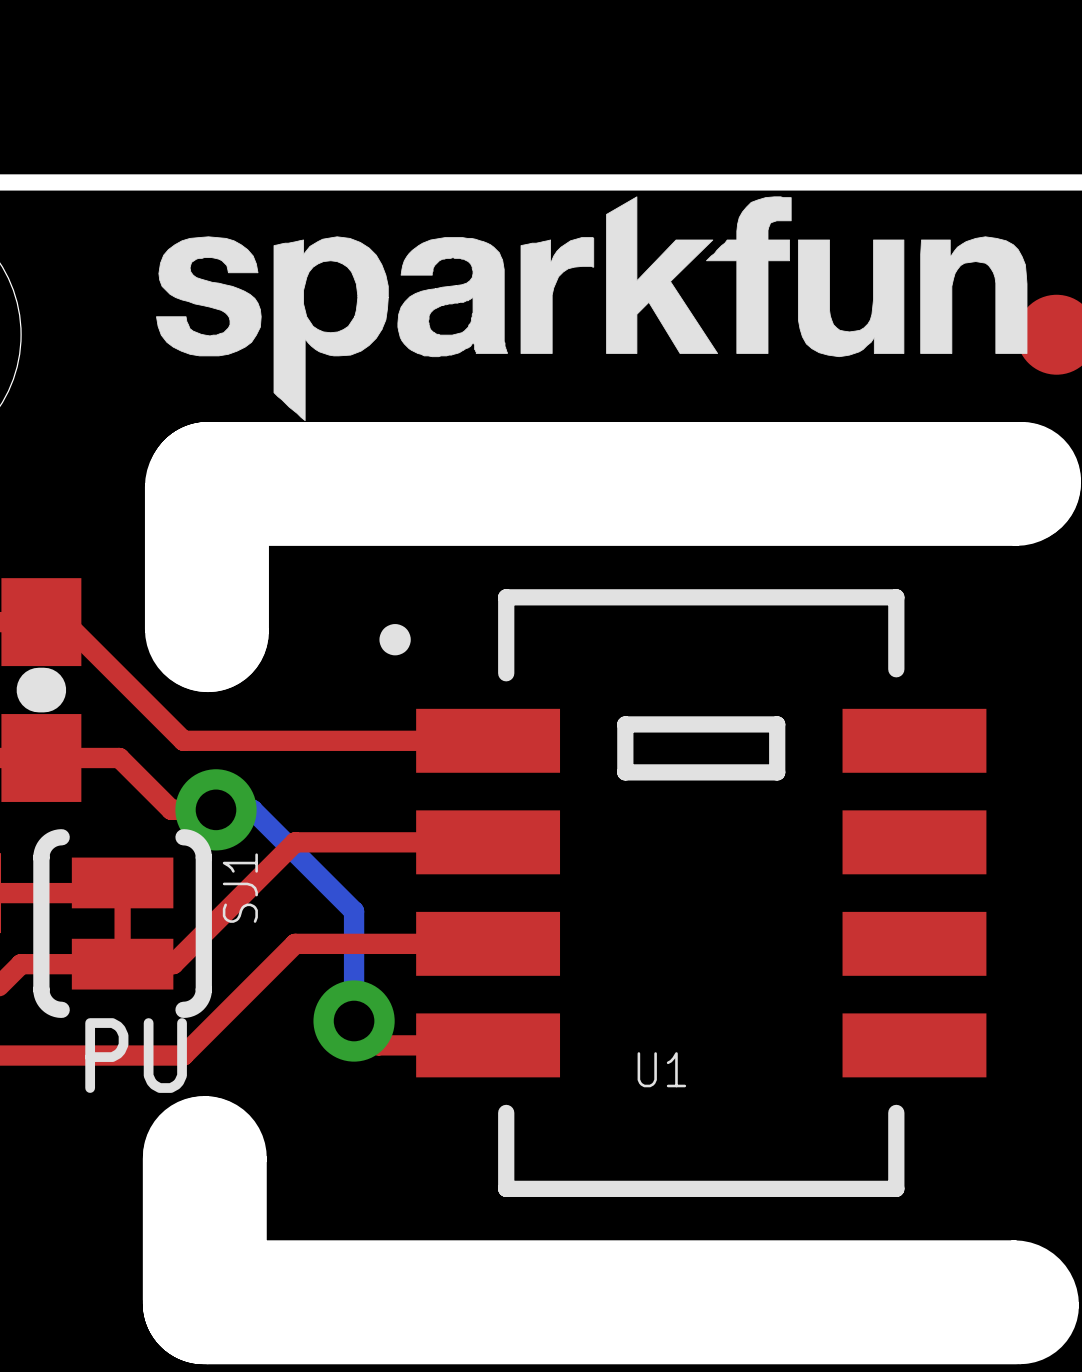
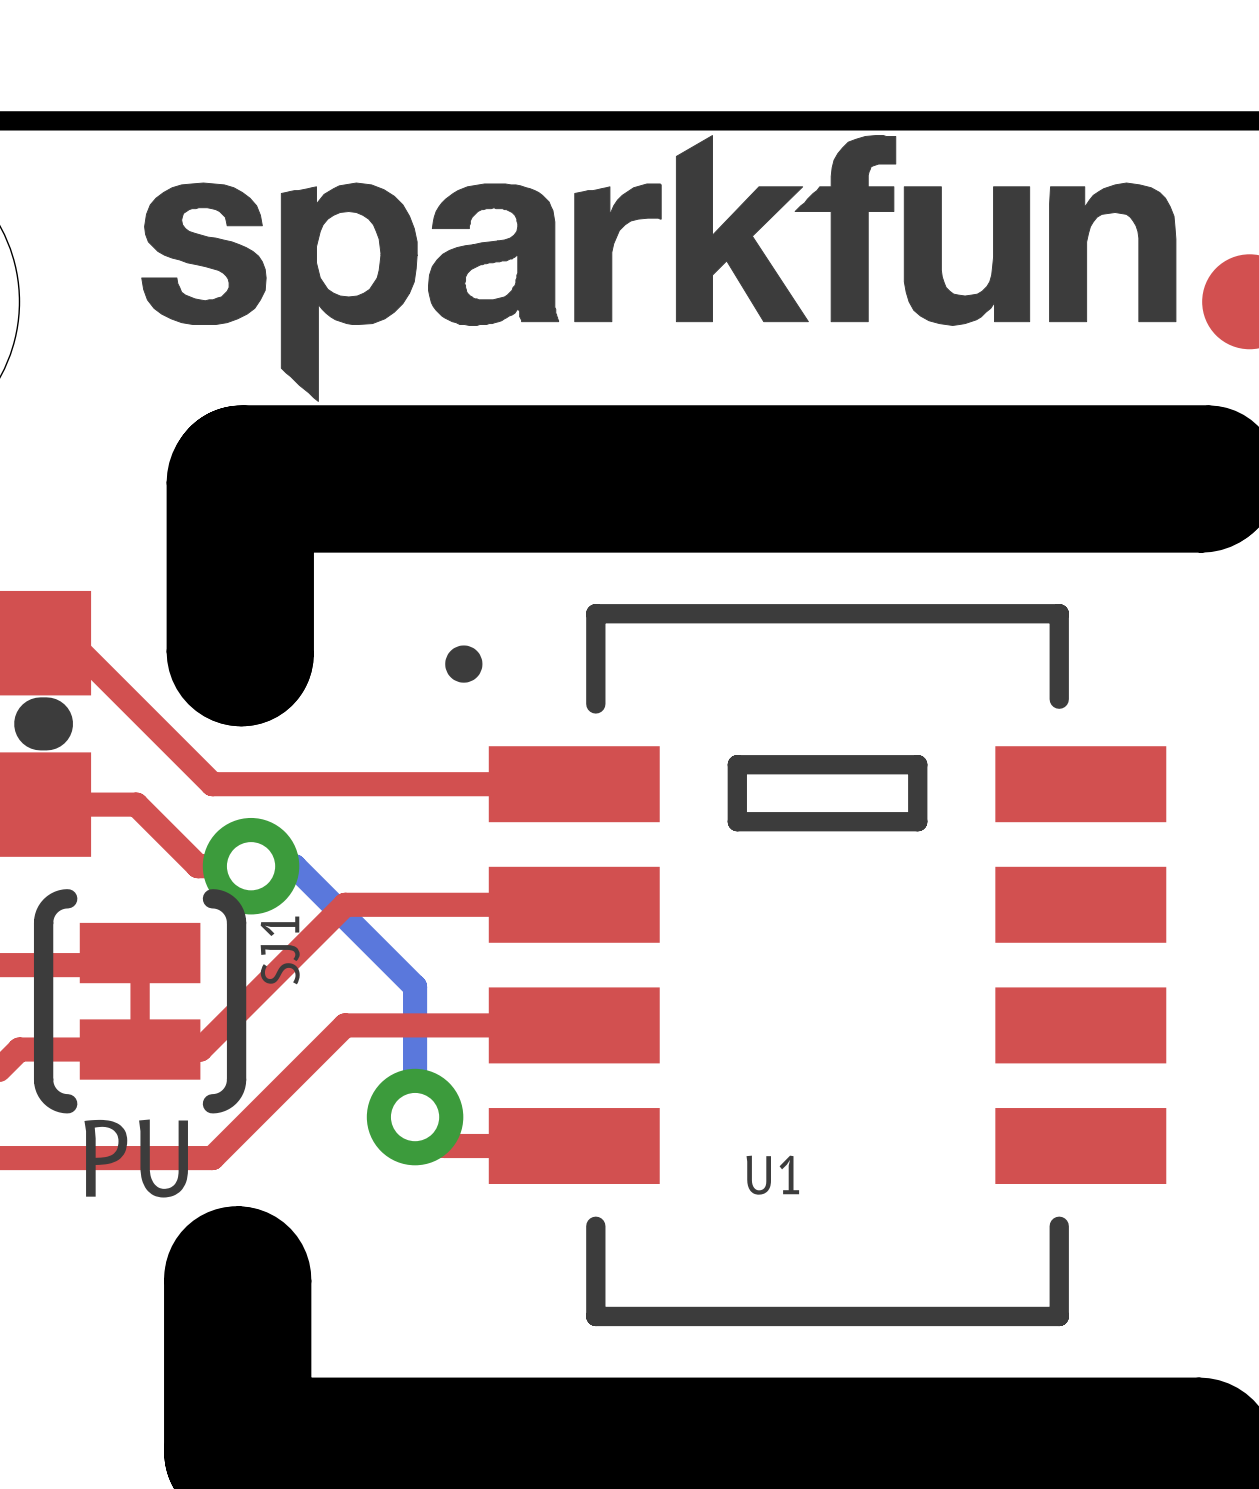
drawing position: (591, 308) -> (658, 268)

